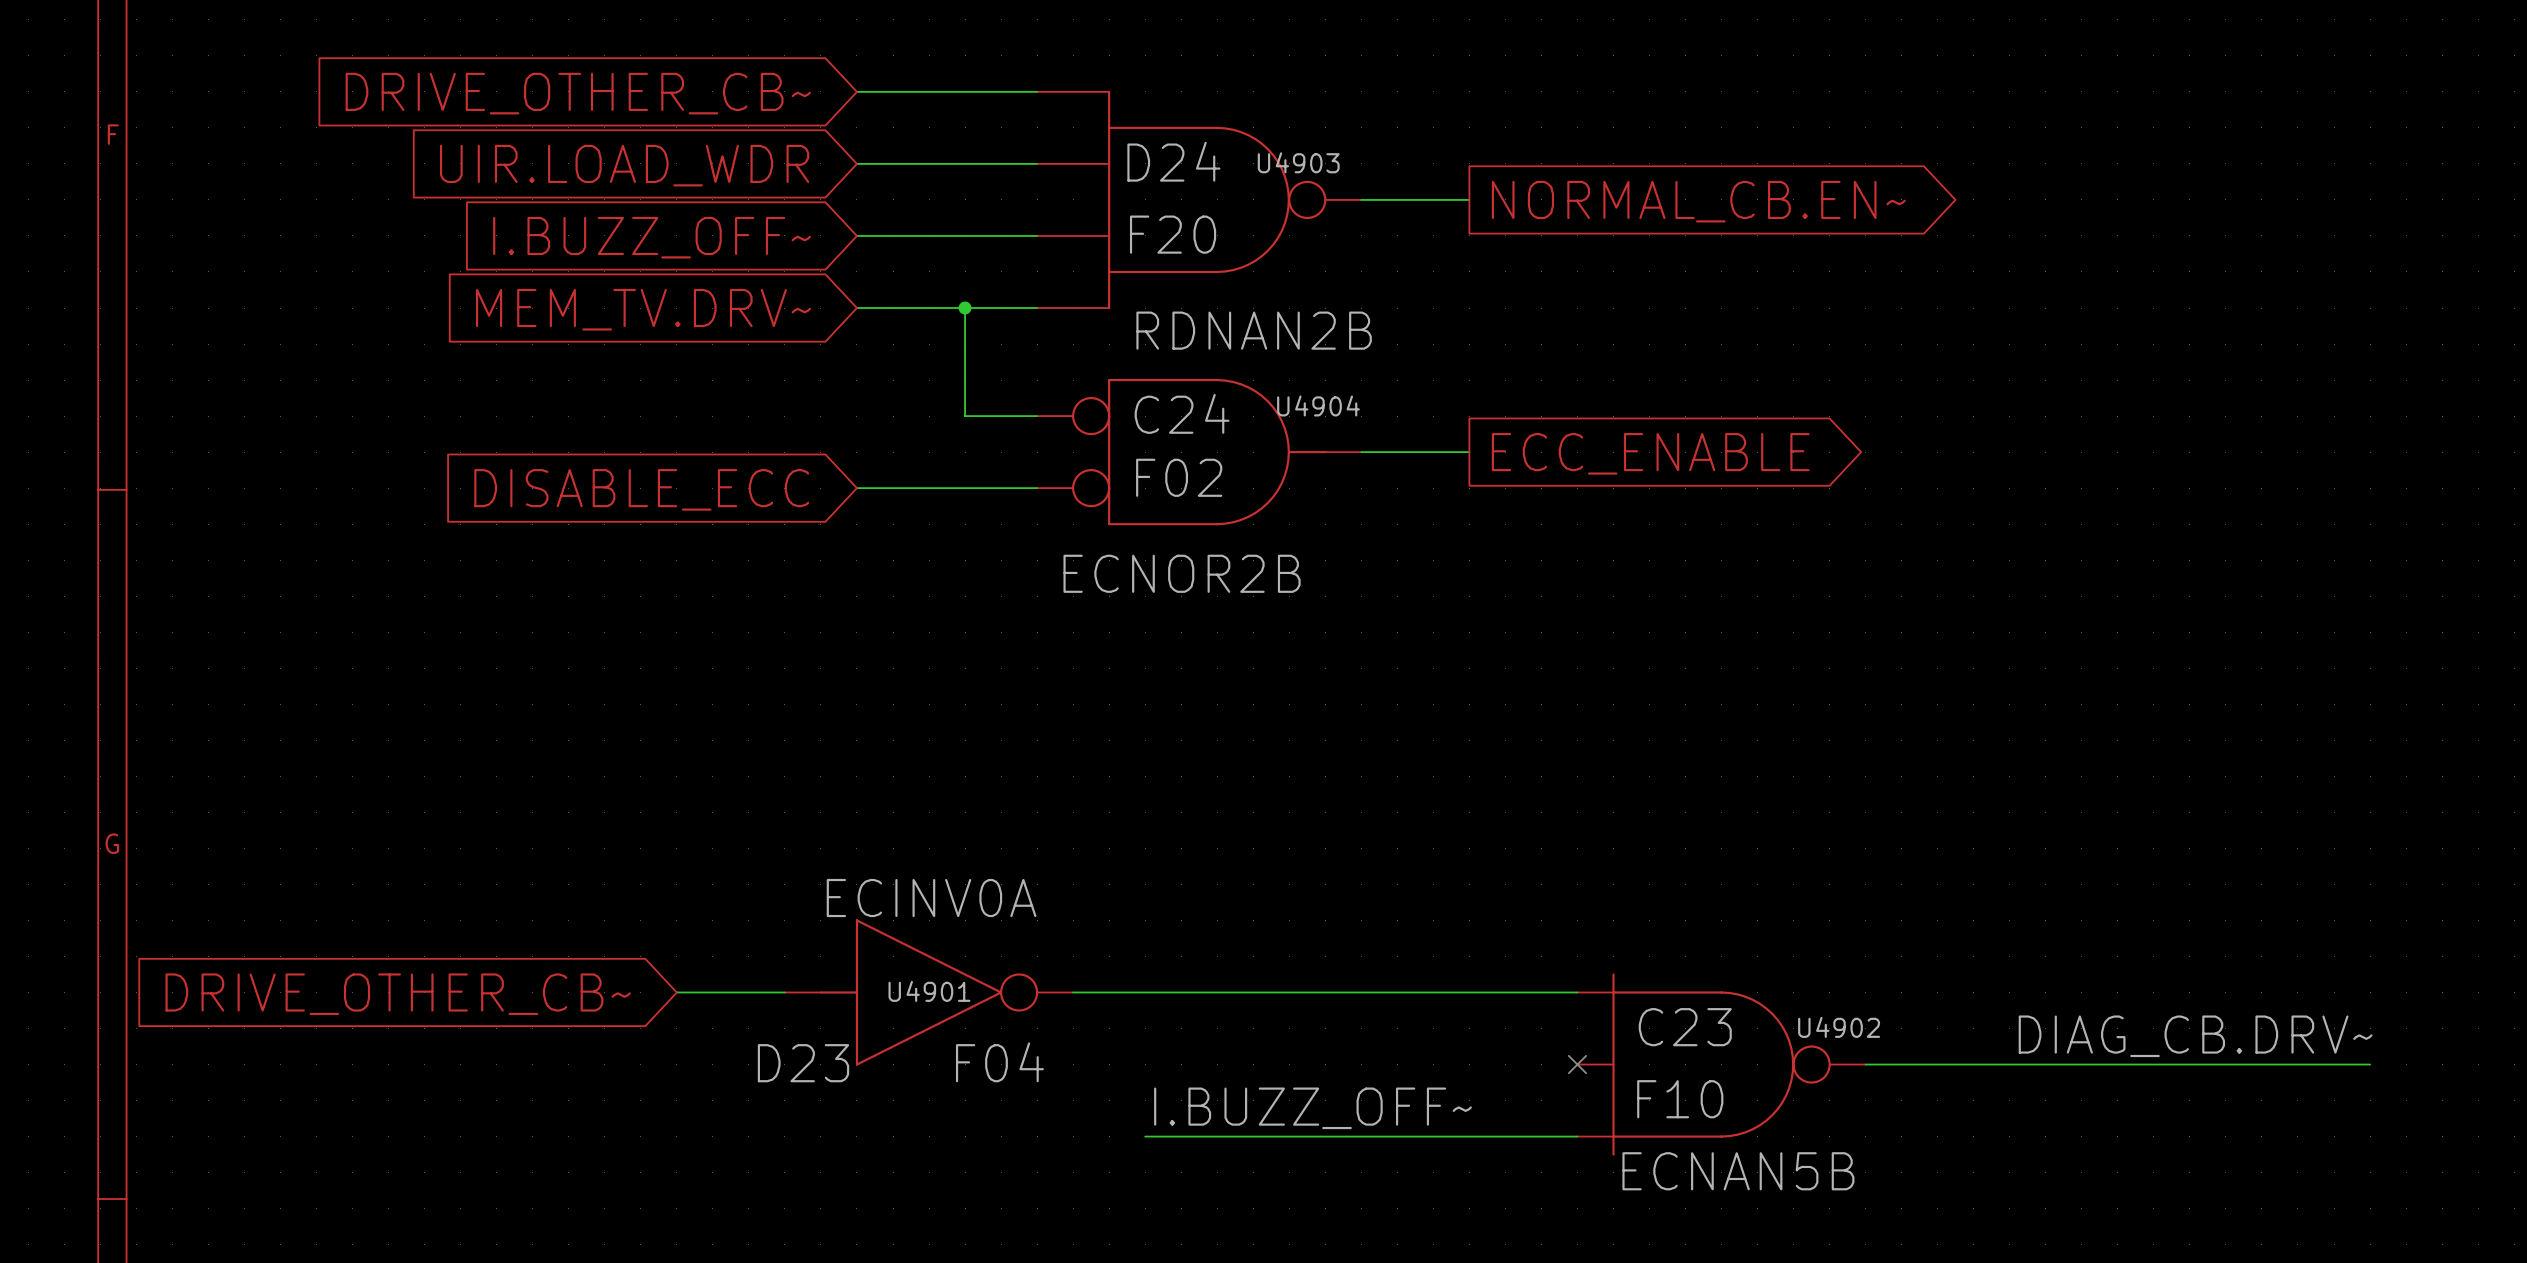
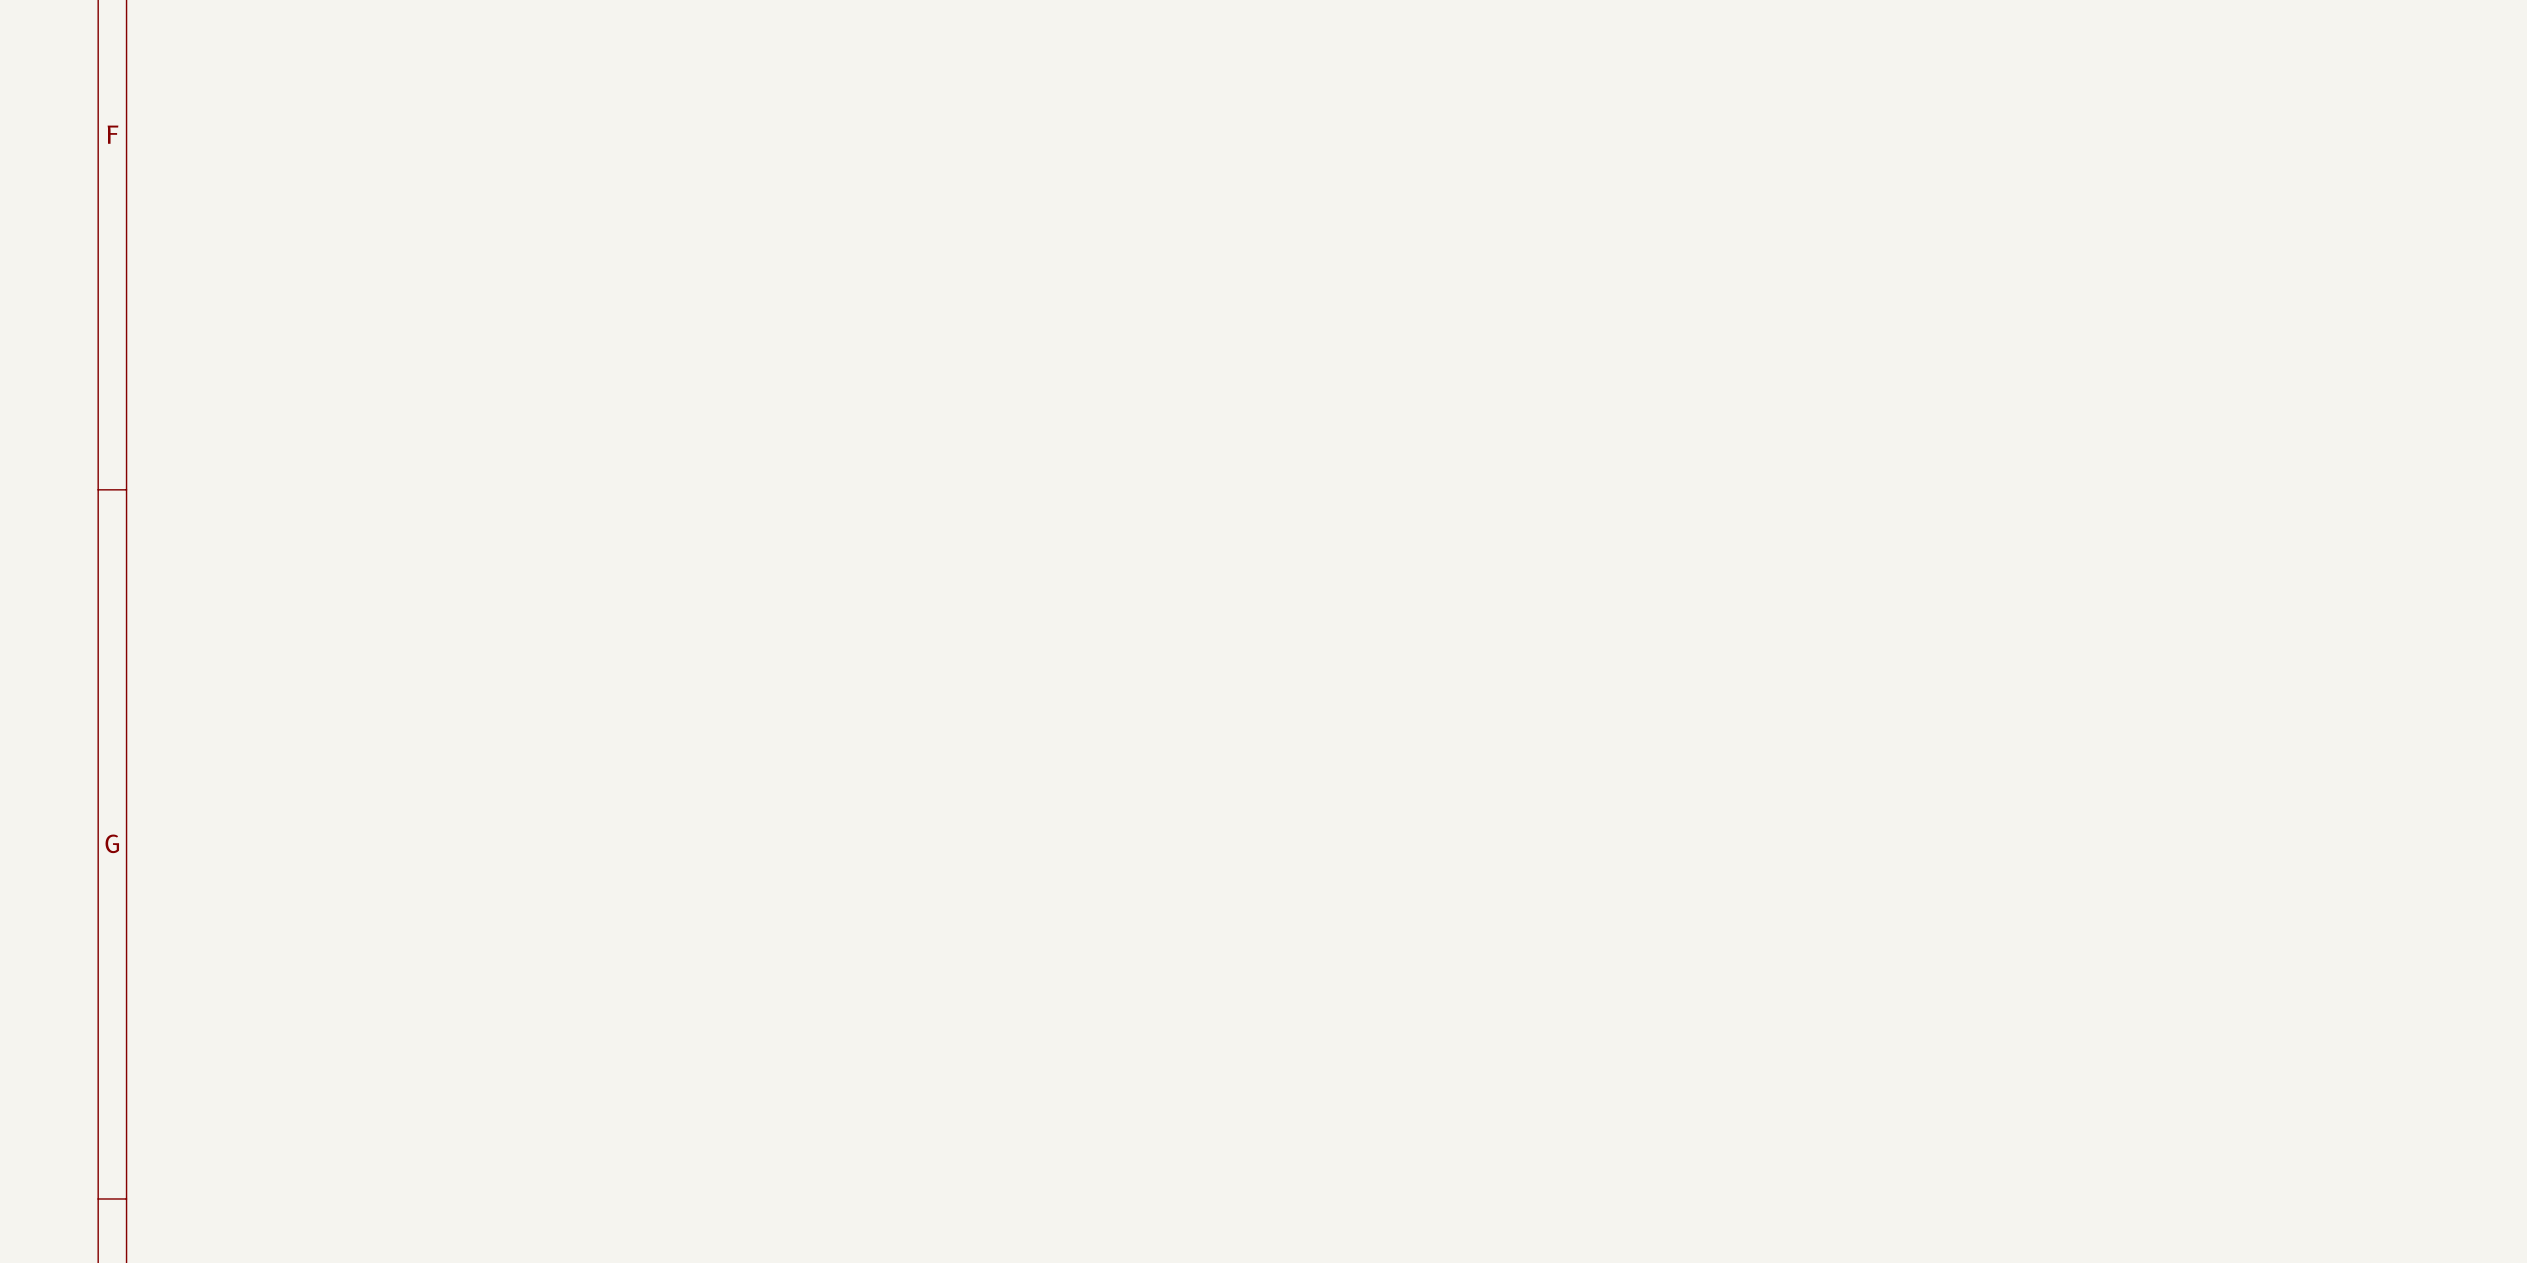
wire: (856, 91) (1037, 91) -> none
global label: DRIVE_OTHER_CB~ (578, 93) -> none
wire: (856, 163) (1037, 163) -> none
global label: UIR.LOAD_WDR (624, 165) -> none
U4903: F20 (1199, 199) -> none
wire: (1361, 199) (1469, 199) -> none
global label: NORMAL_CB.EN~ (1698, 201) -> none
wire: (856, 235) (1037, 235) -> none
global label: I.BUZZ_OFF~ (652, 237) -> none
wire: (856, 308) (1037, 308) -> none
wire: (965, 308) (965, 416) (1037, 416) -> none
junction: (965, 308) -> none
global label: MEM_TV.DRV~ (643, 309) -> none
U4904: F02 (1199, 452) -> none
wire: (1361, 452) (1469, 452) -> none
global label: ECC_ENABLE (1650, 453) -> none
wire: (856, 488) (1037, 488) -> none
global label: DISABLE_ECC (641, 489) -> none
wire: (676, 992) (784, 992) -> none
U4901: F04 (929, 992) -> none
wire: (1073, 992) (1577, 992) -> none
global label: DRIVE_OTHER_CB~ (398, 994) -> none
label: DIAG_CB.DRV~ (2195, 1036) -> none
no-connect mark: (1577, 1064) -> none
U4902: F10 (1721, 1064) -> none
wire: (1865, 1064) (2370, 1064) -> none
label: I.BUZZ_OFF~ (1313, 1108) -> none
wire: (1145, 1136) (1577, 1136) -> none

